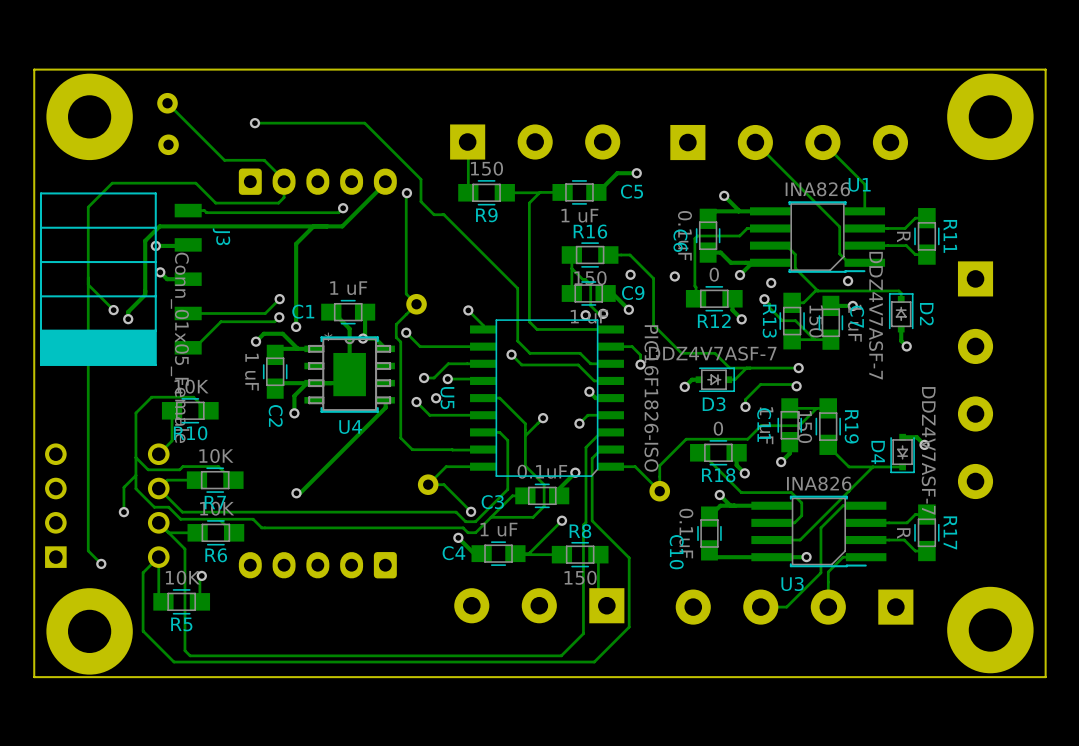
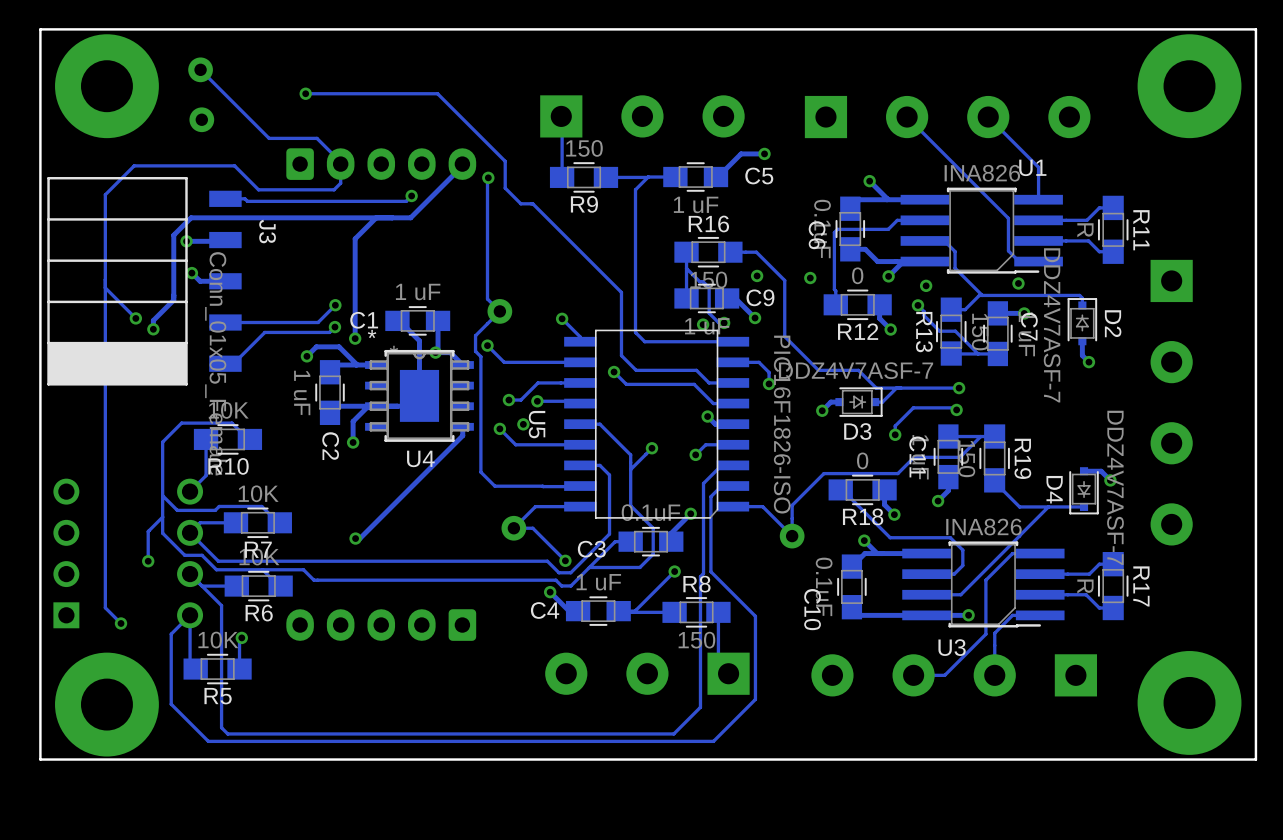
U4 text: none -> * (372, 334)

